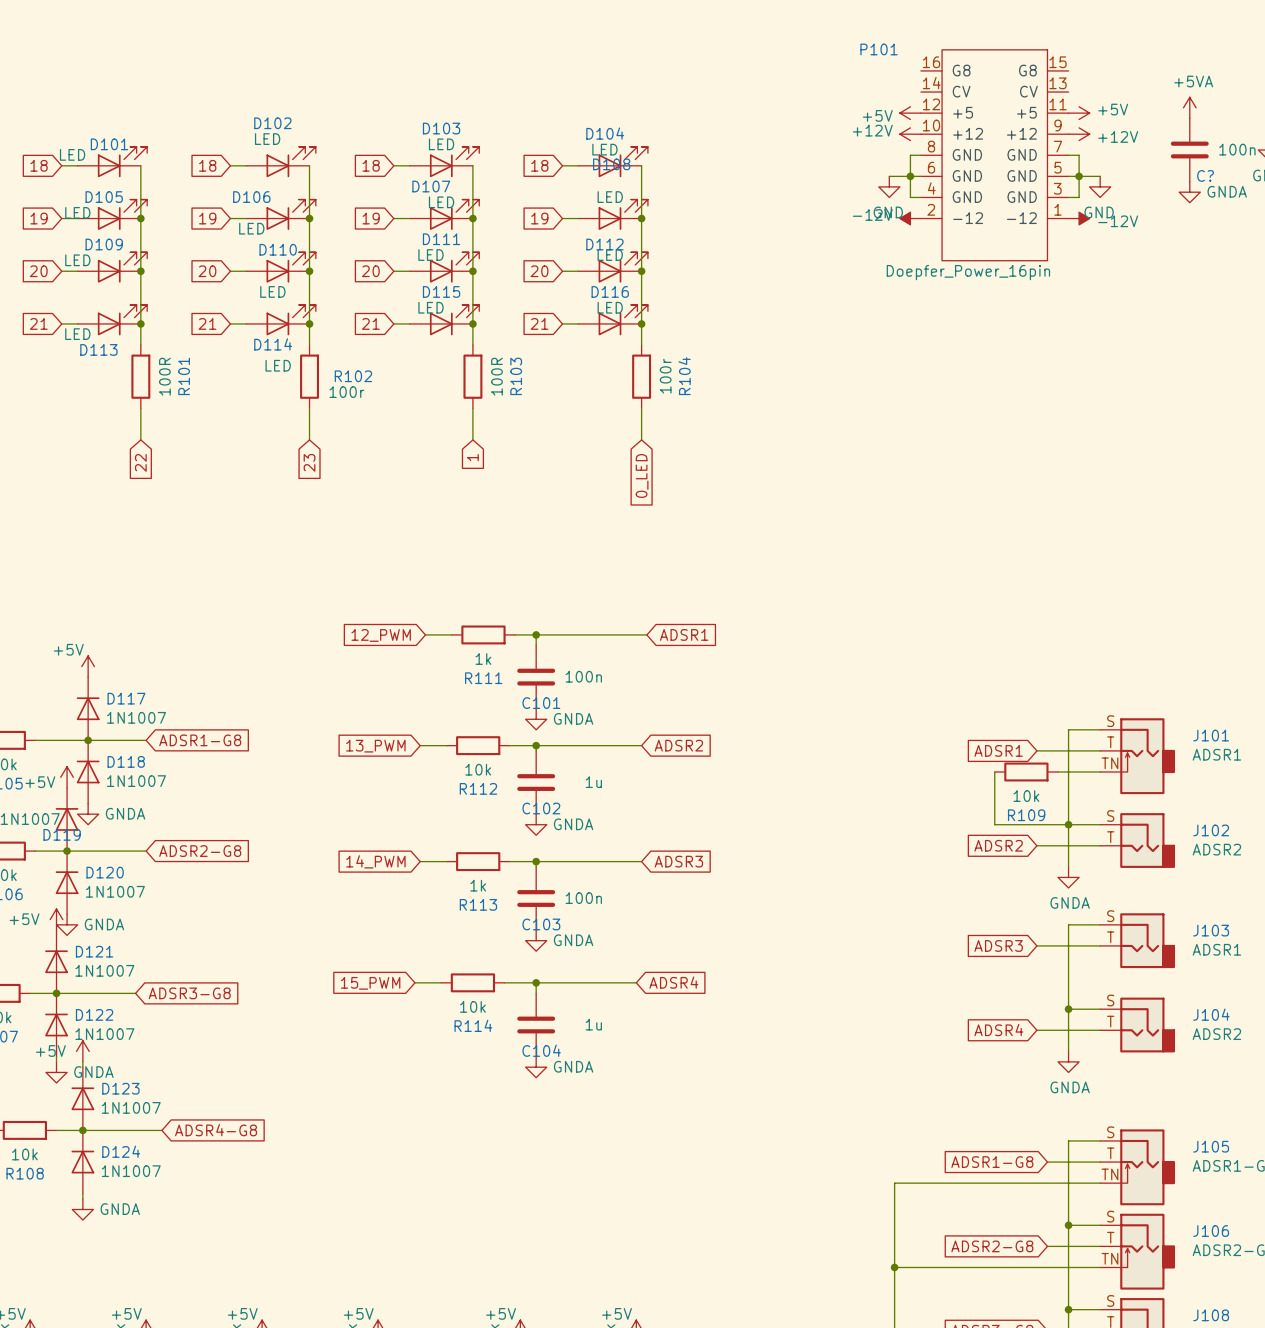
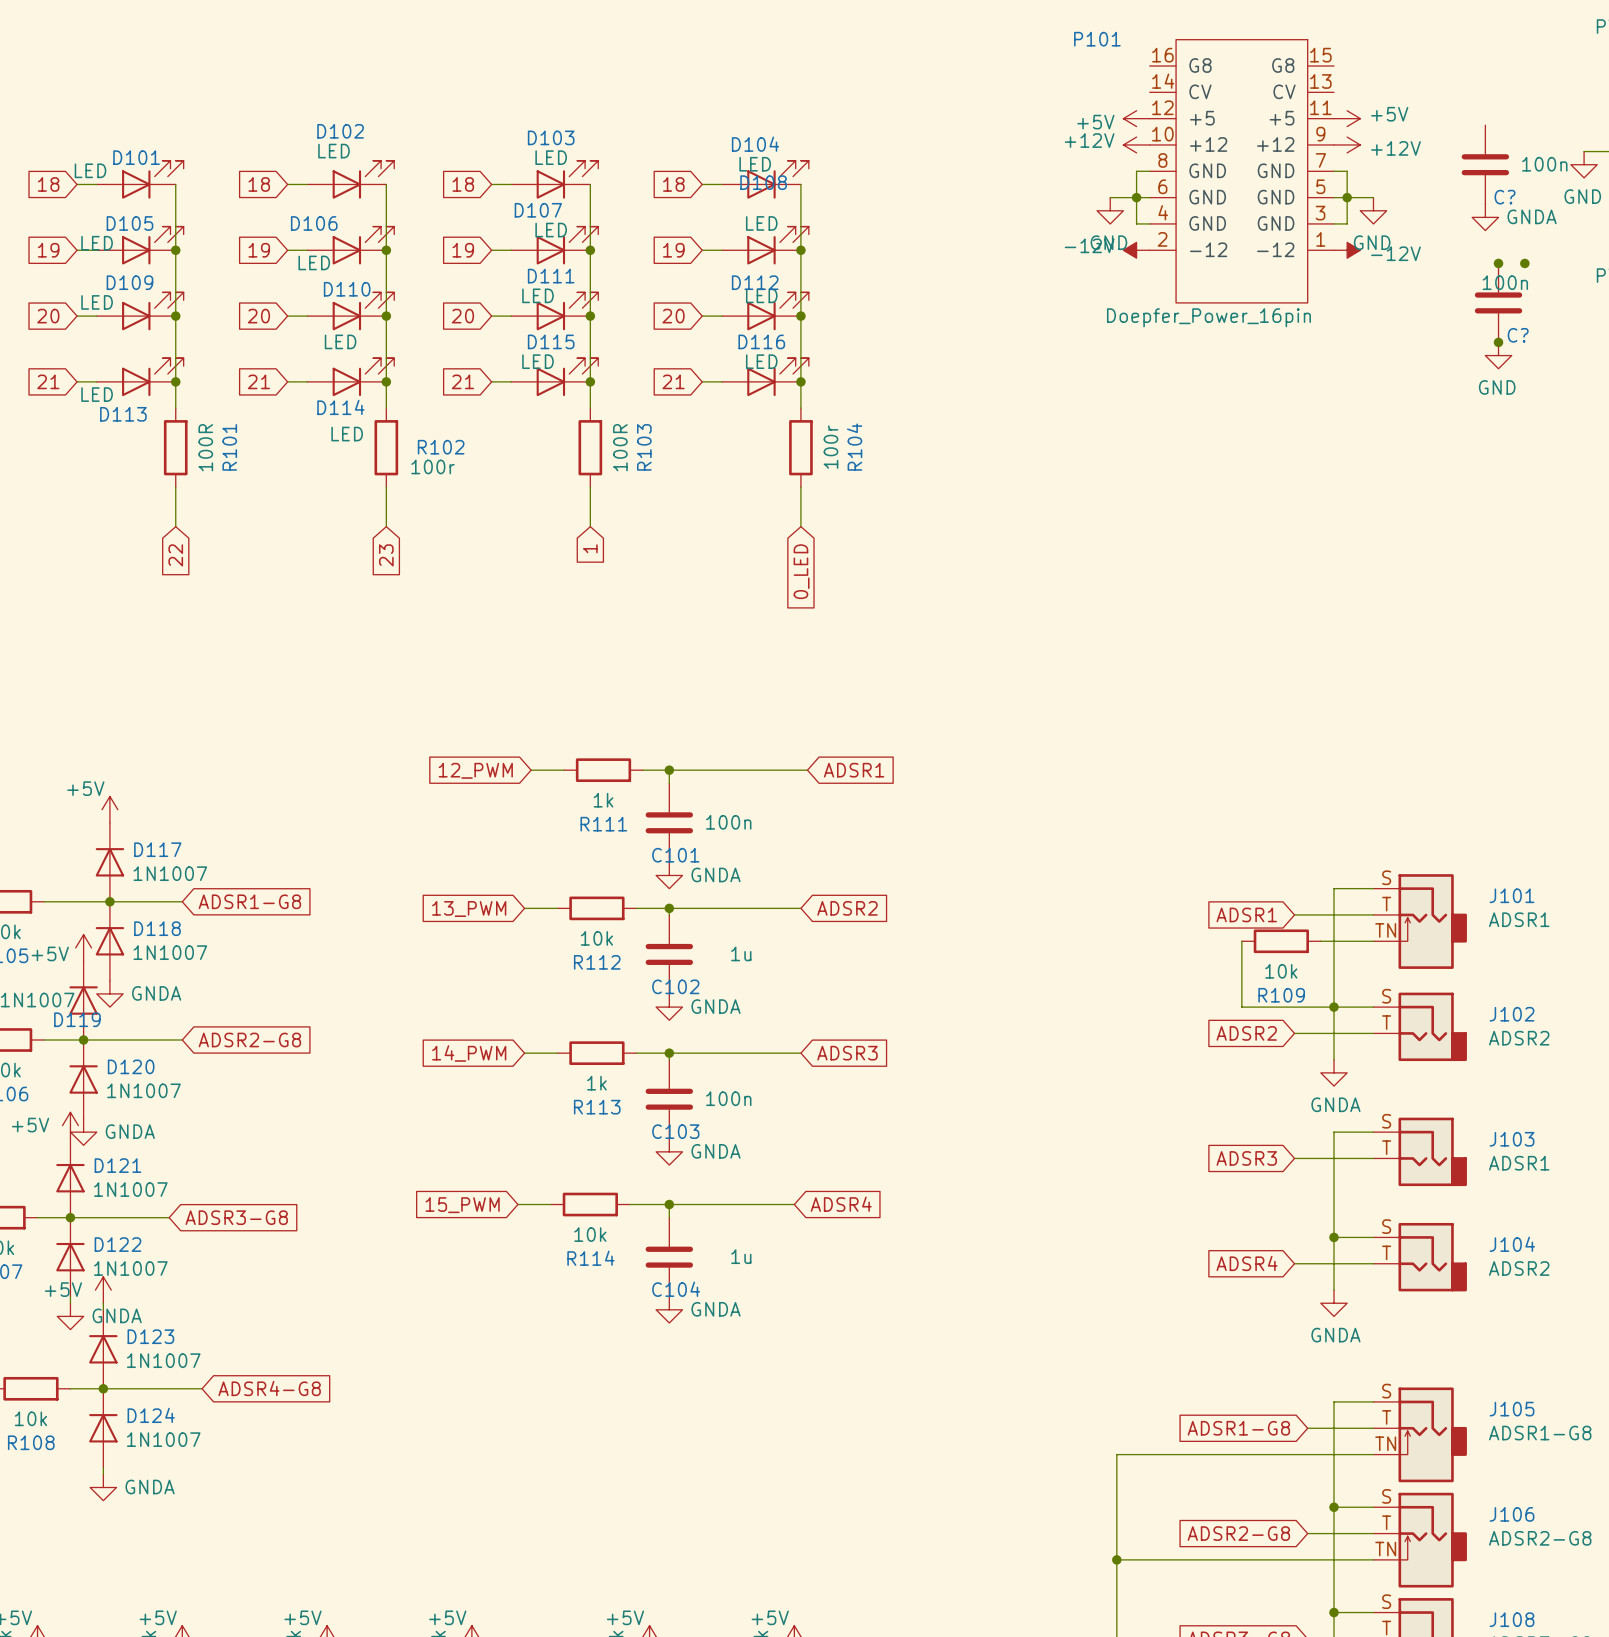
power symbol: +5VA (1189, 107) -> none
junction: none -> (1498, 263)
junction: none -> (1524, 263)
C?: none -> 100n (1498, 302)
junction: none -> (1498, 342)
power symbol: none -> GND (1498, 355)

